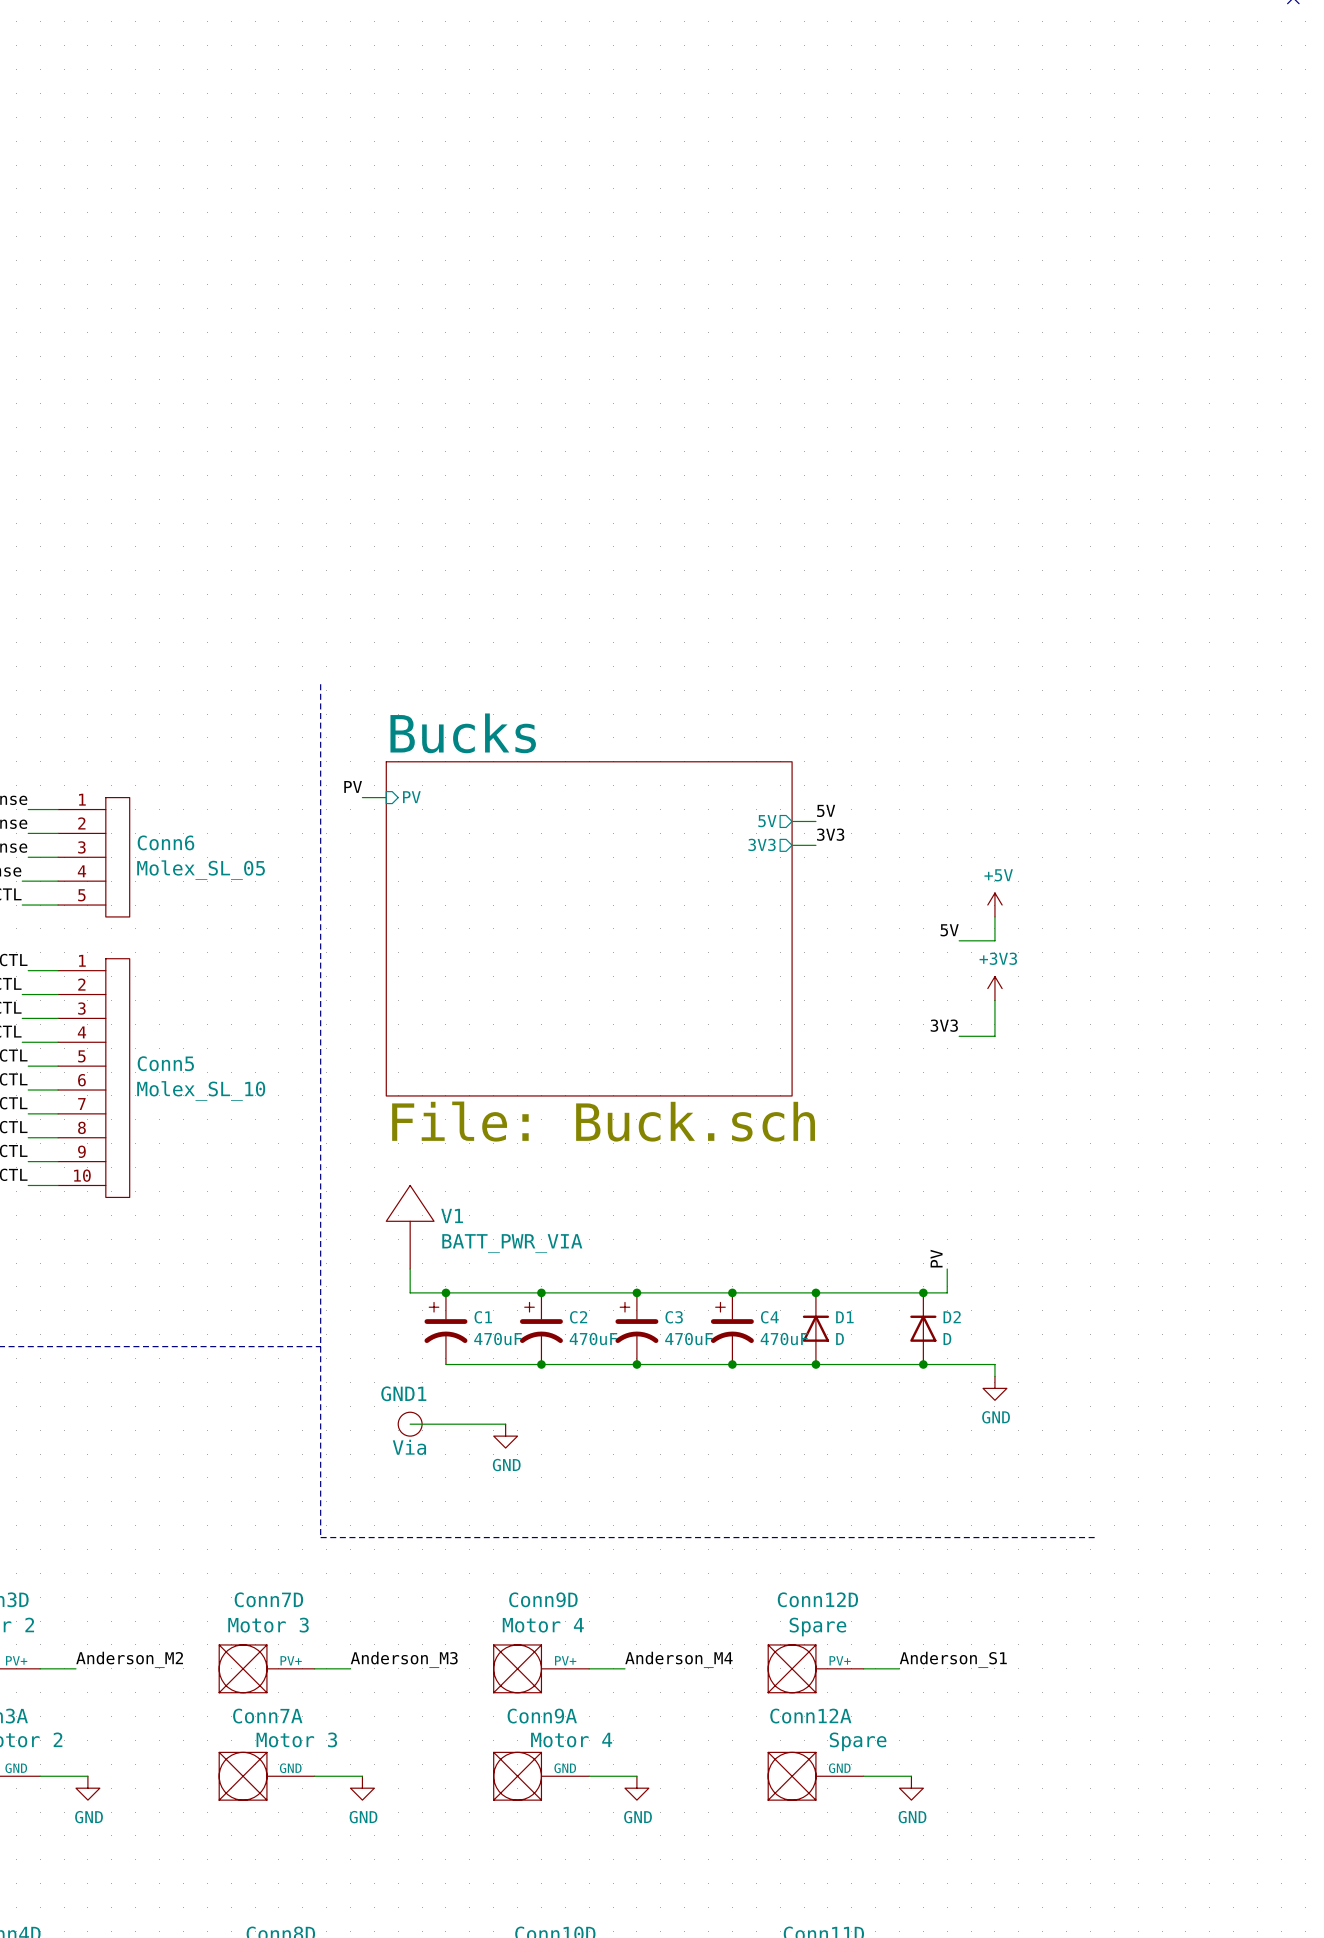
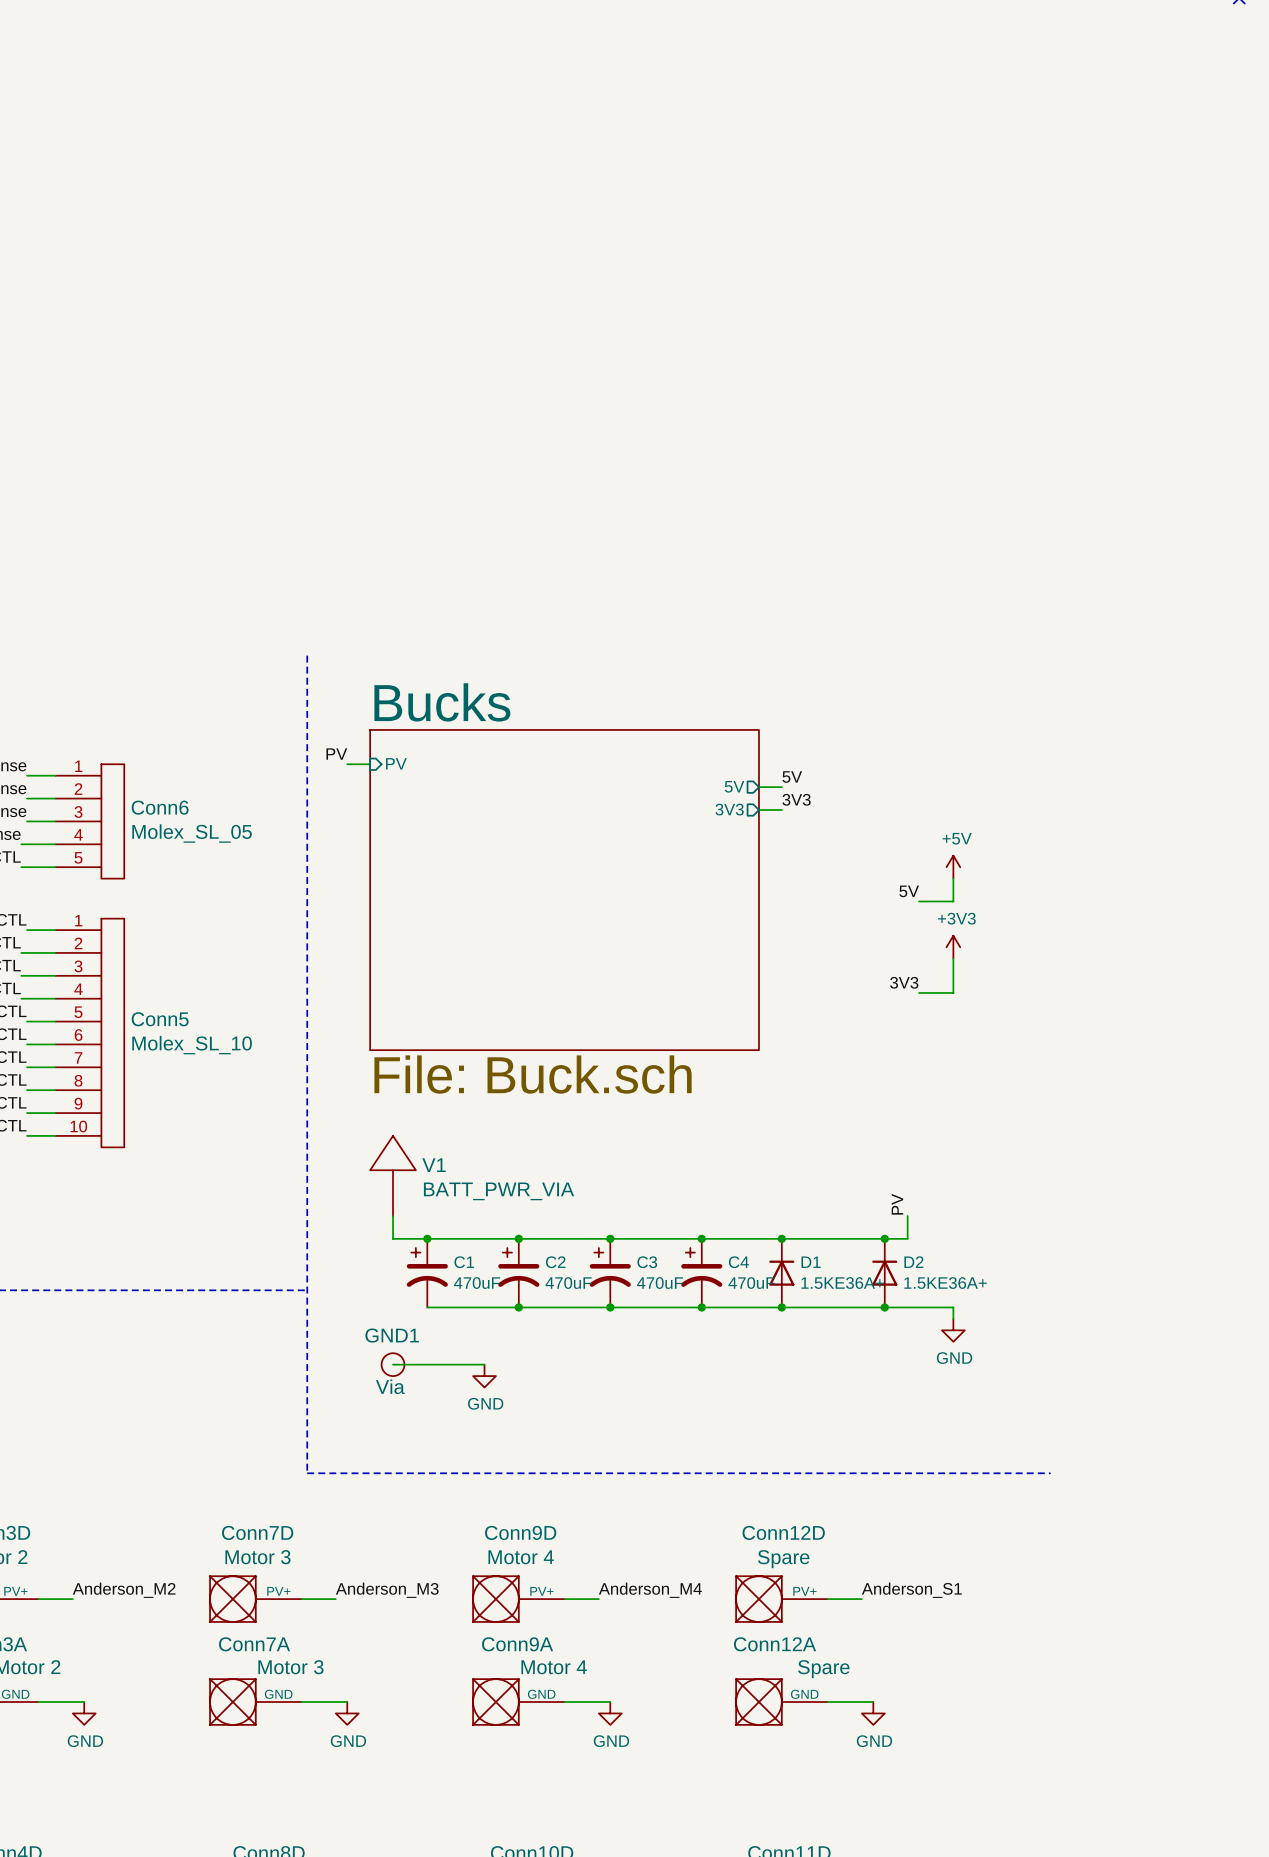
D1 value: D (840, 1339) -> 1.5KE36A+ (842, 1283)
D2 value: D (947, 1339) -> 1.5KE36A+ (945, 1283)

